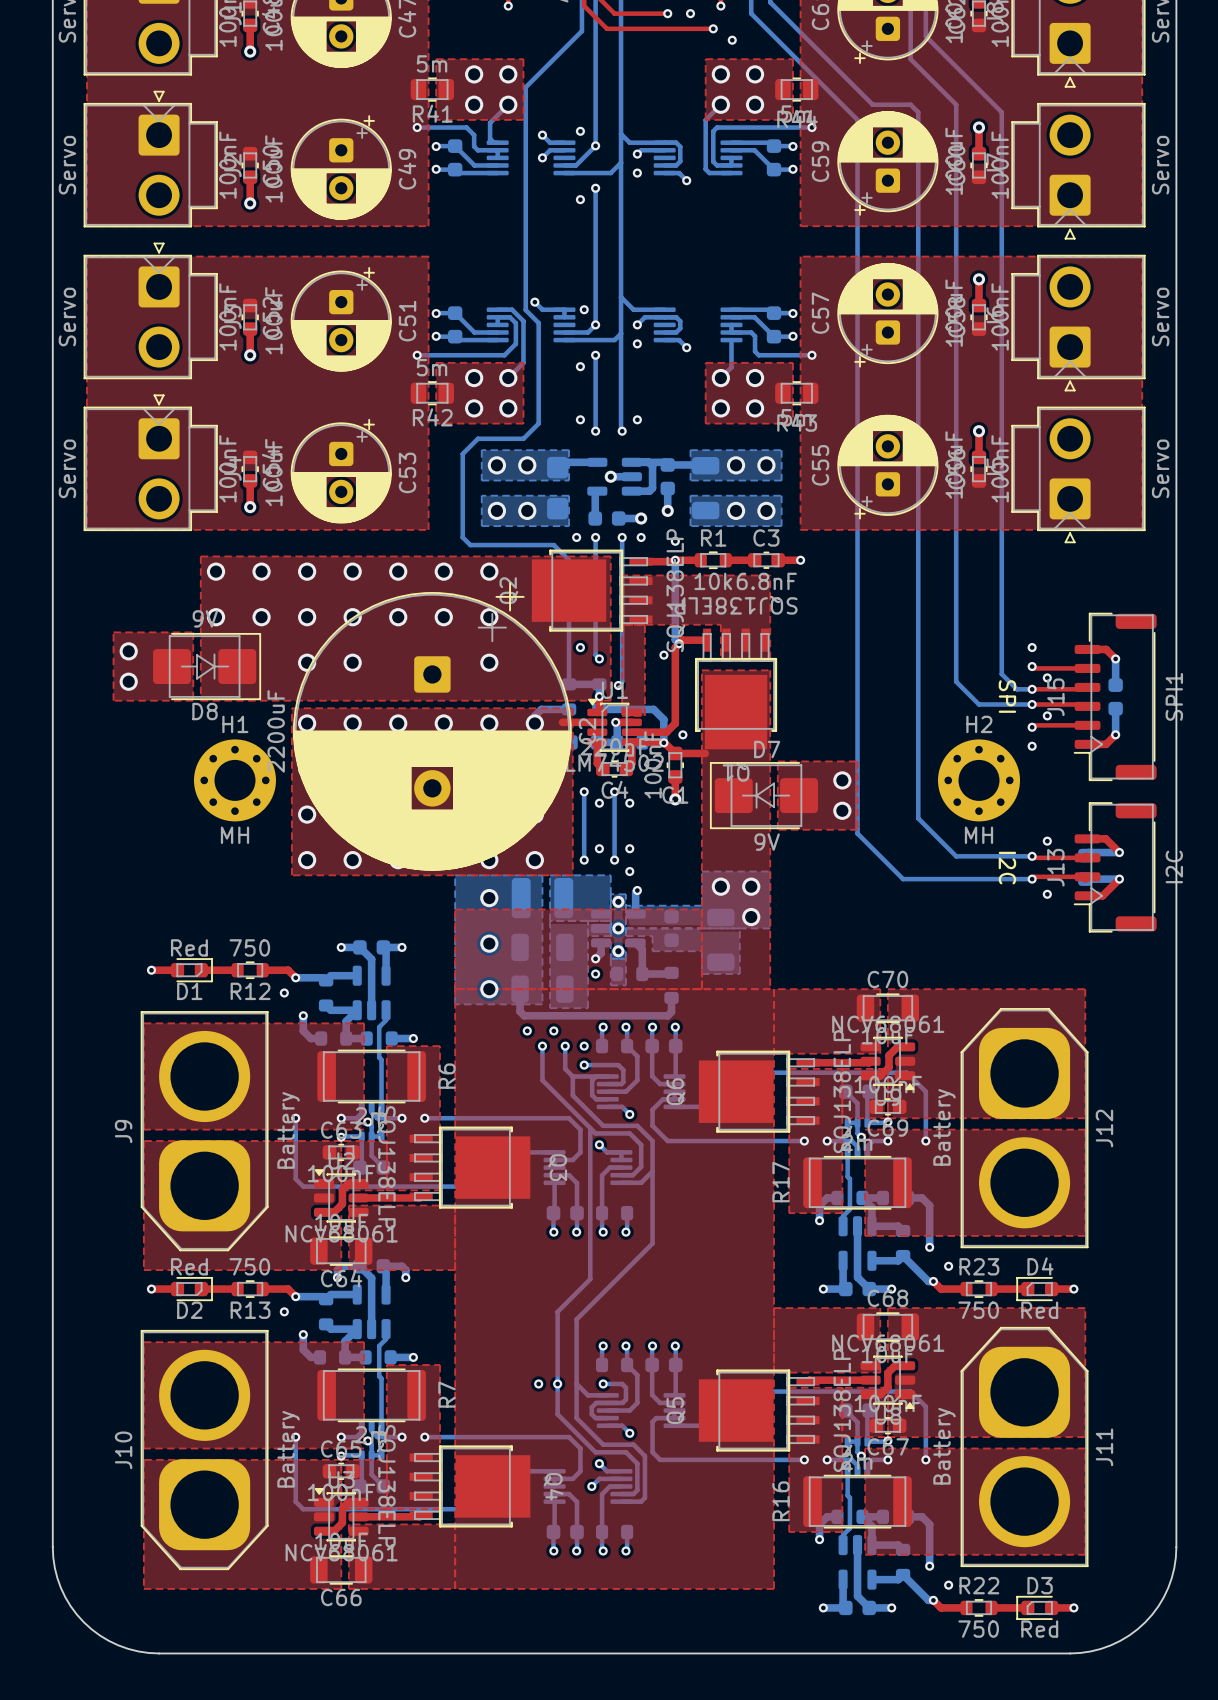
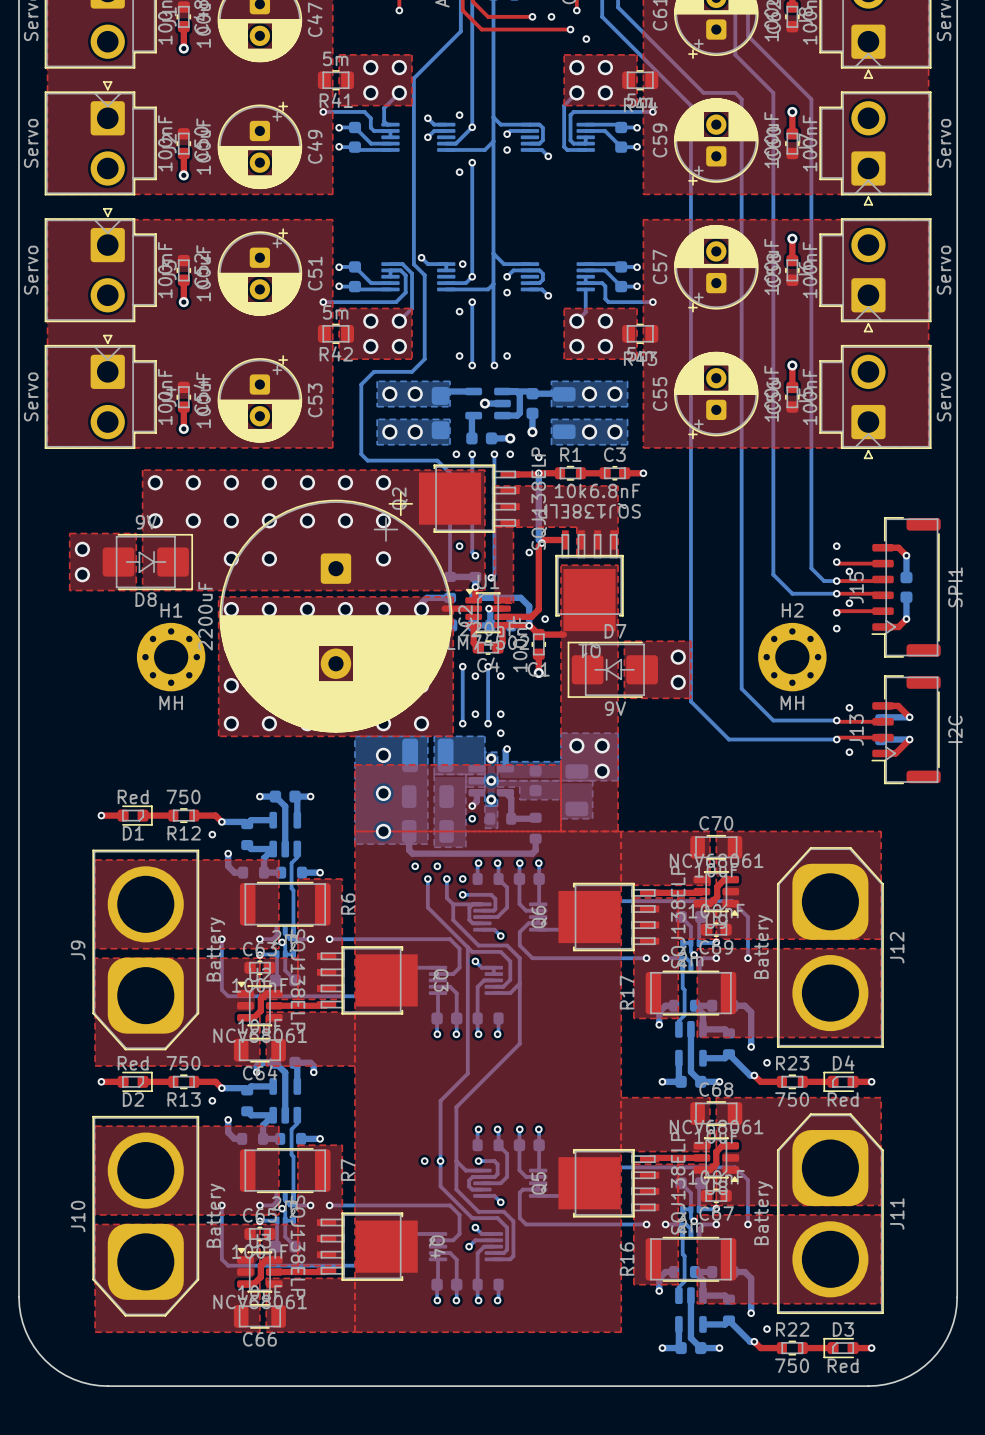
text: SPI (1007, 696) -> none
text: I2C (1007, 868) -> none

